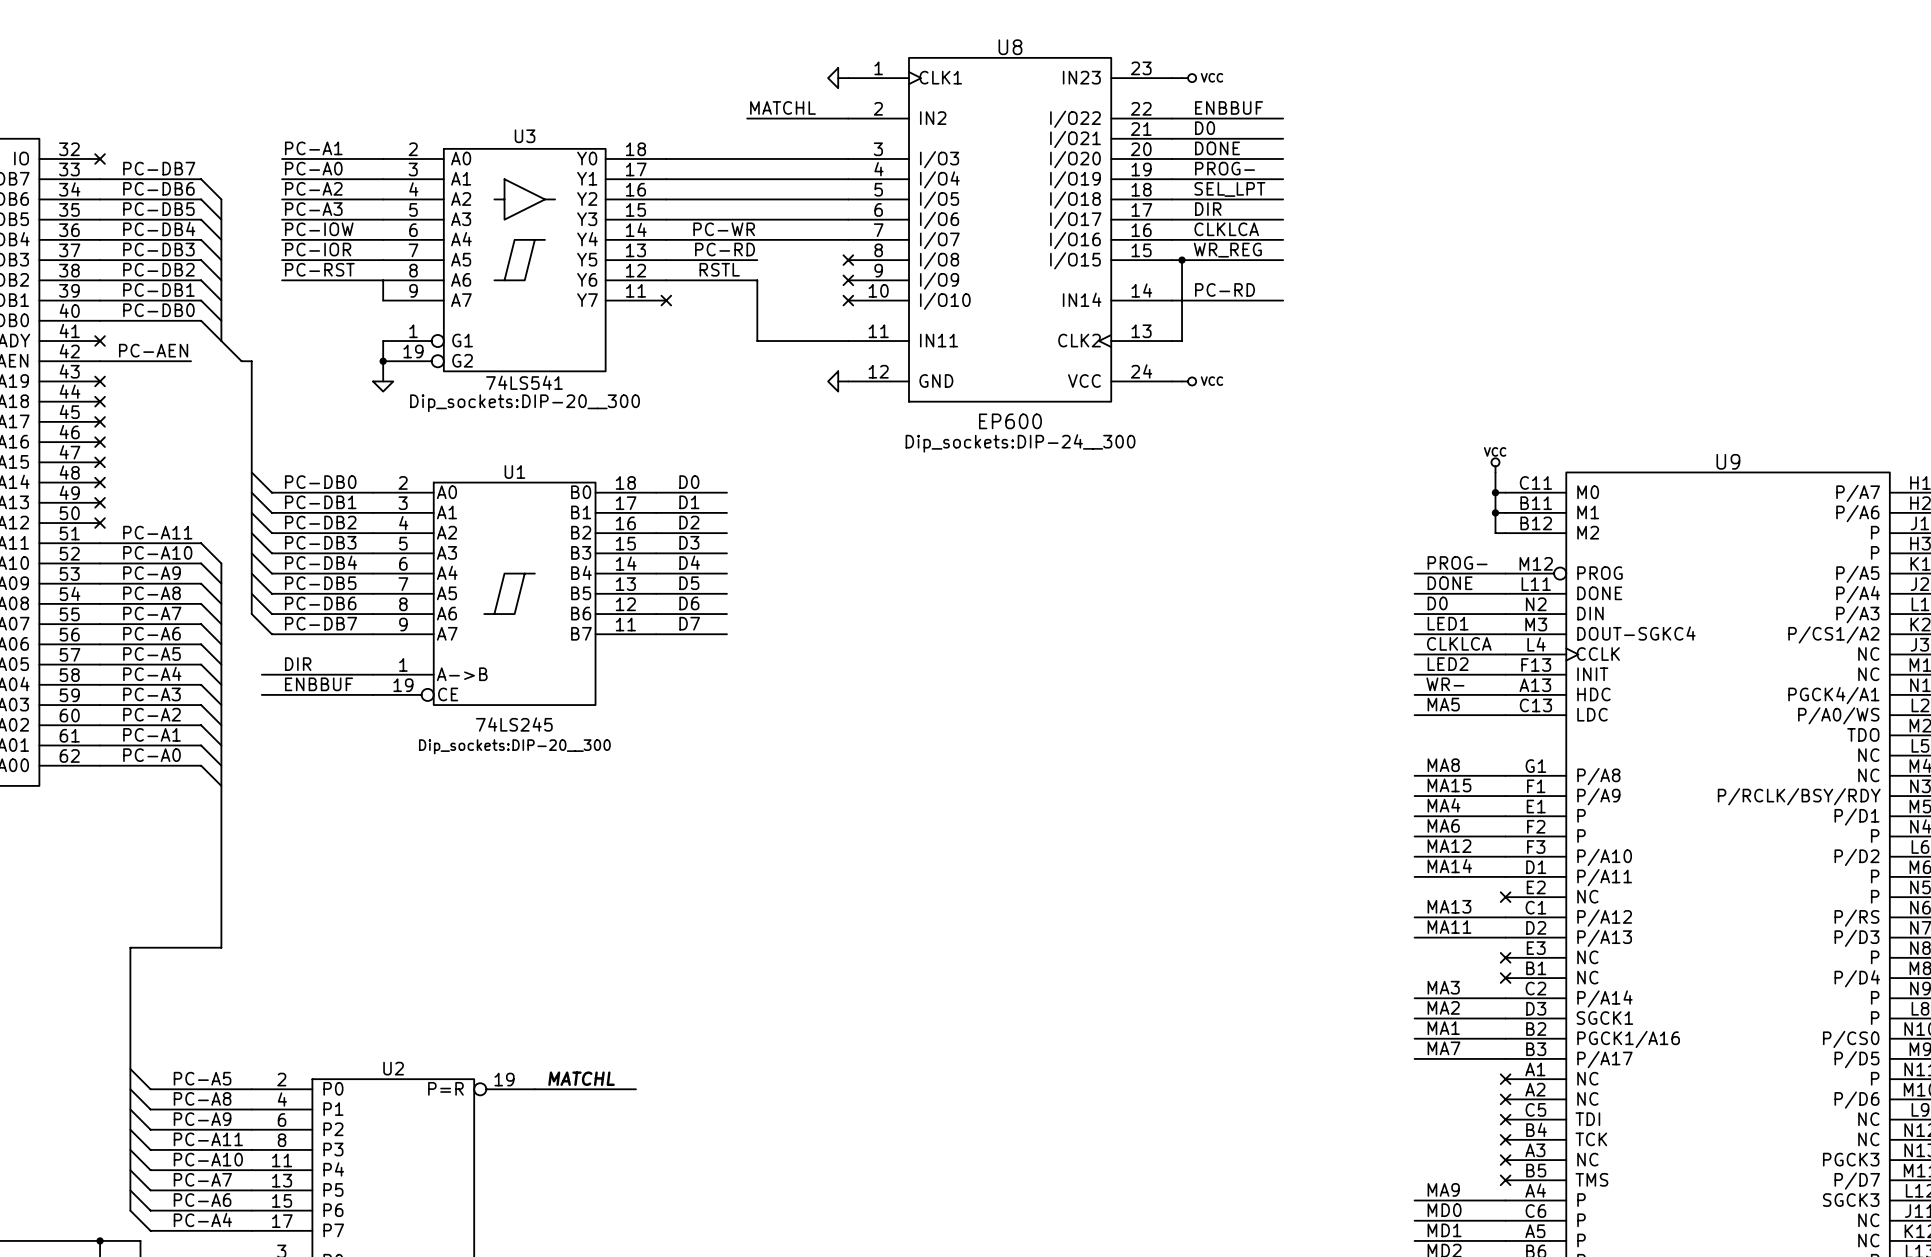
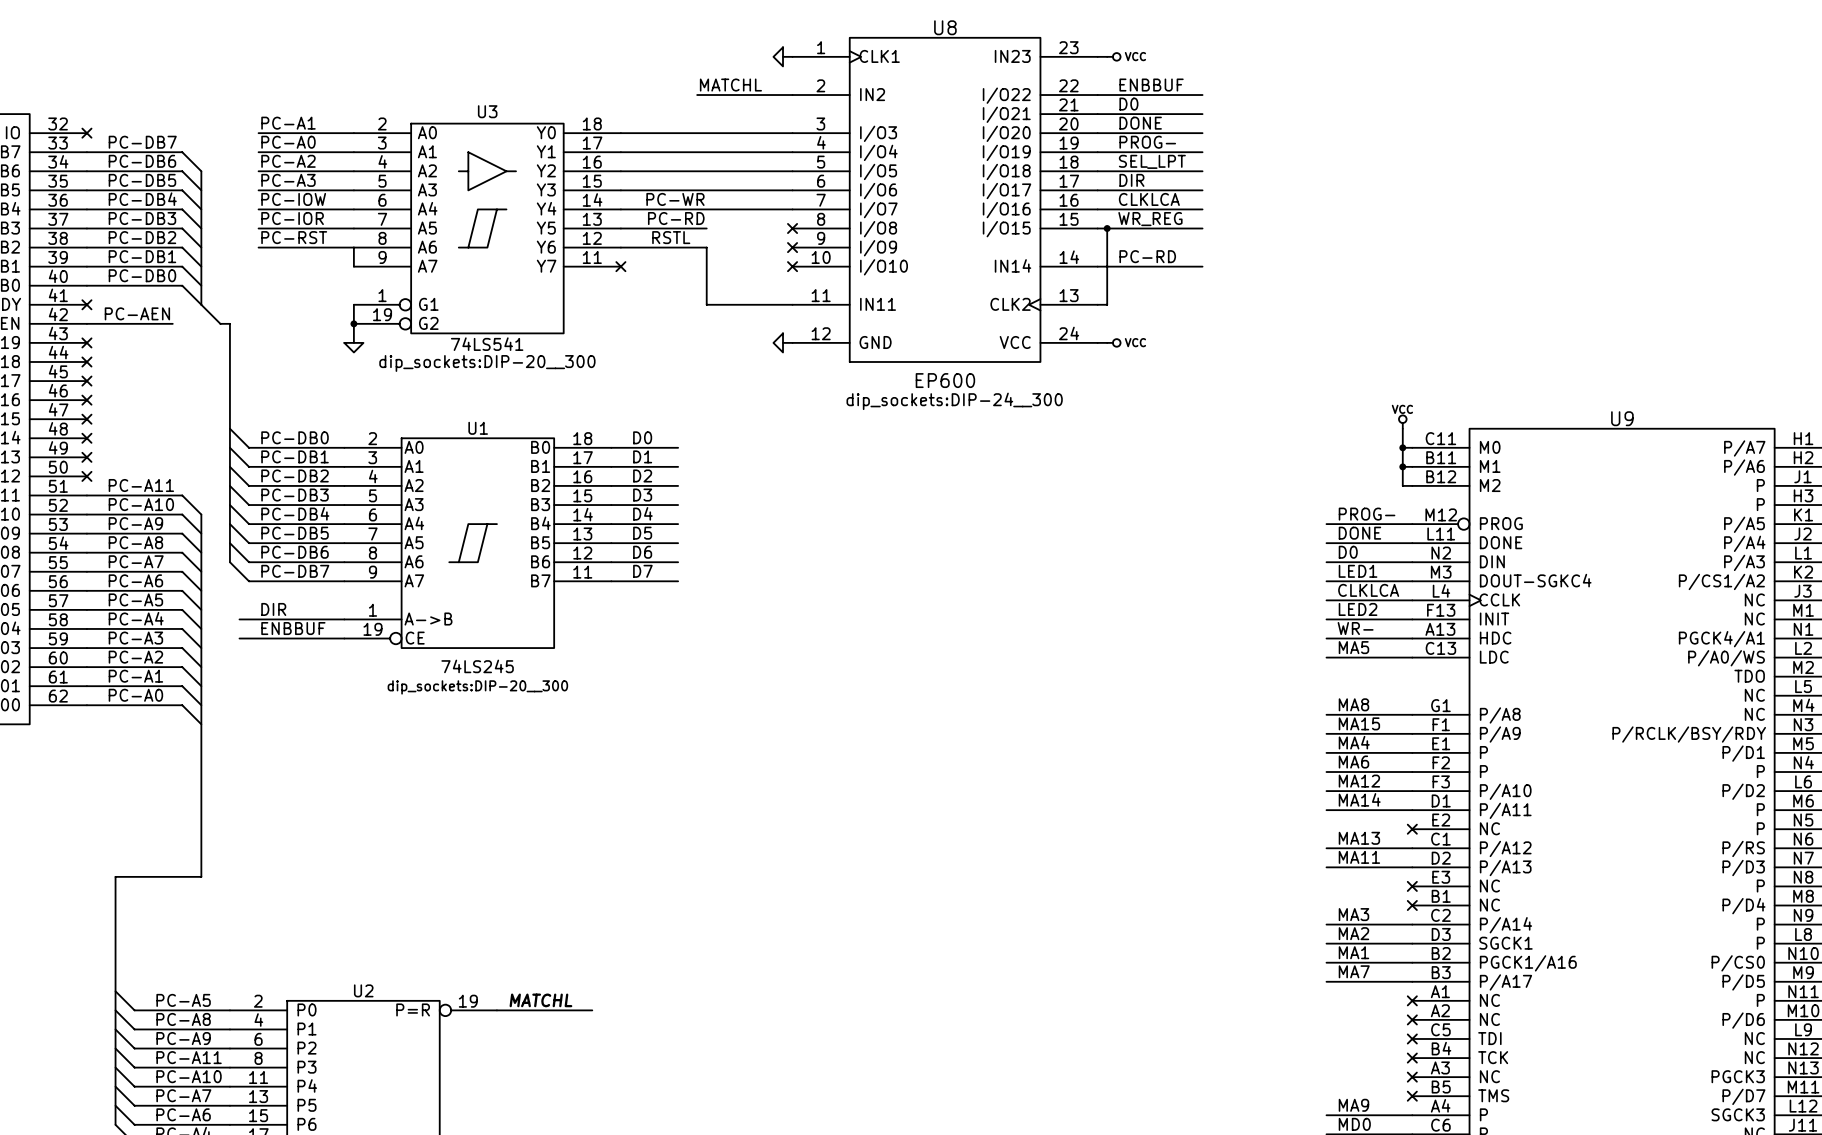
U3 text: Dip_sockets:DIP-20__300 (525, 403) -> dip_sockets:DIP-20__300 (487, 363)
U8 text: Dip_sockets:DIP-24__300 (1020, 443) -> dip_sockets:DIP-24__300 (954, 401)
U1 text: Dip_sockets:DIP-20__300 (514, 746) -> dip_sockets:DIP-20__300 (477, 687)

